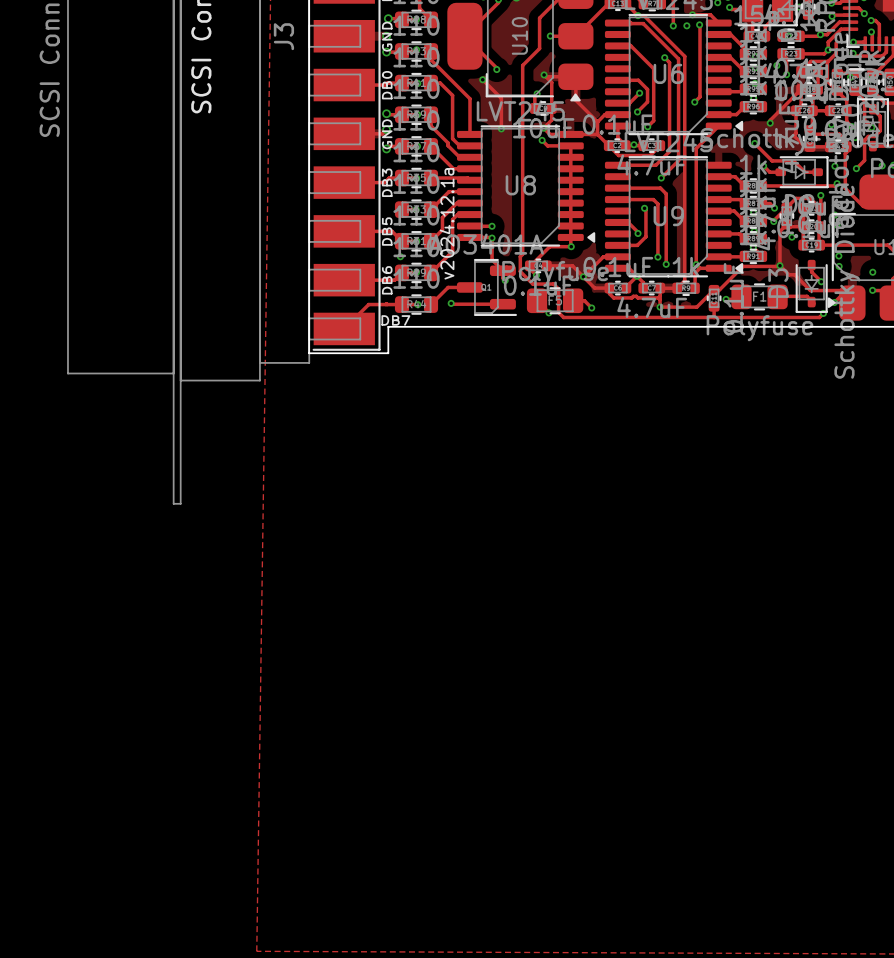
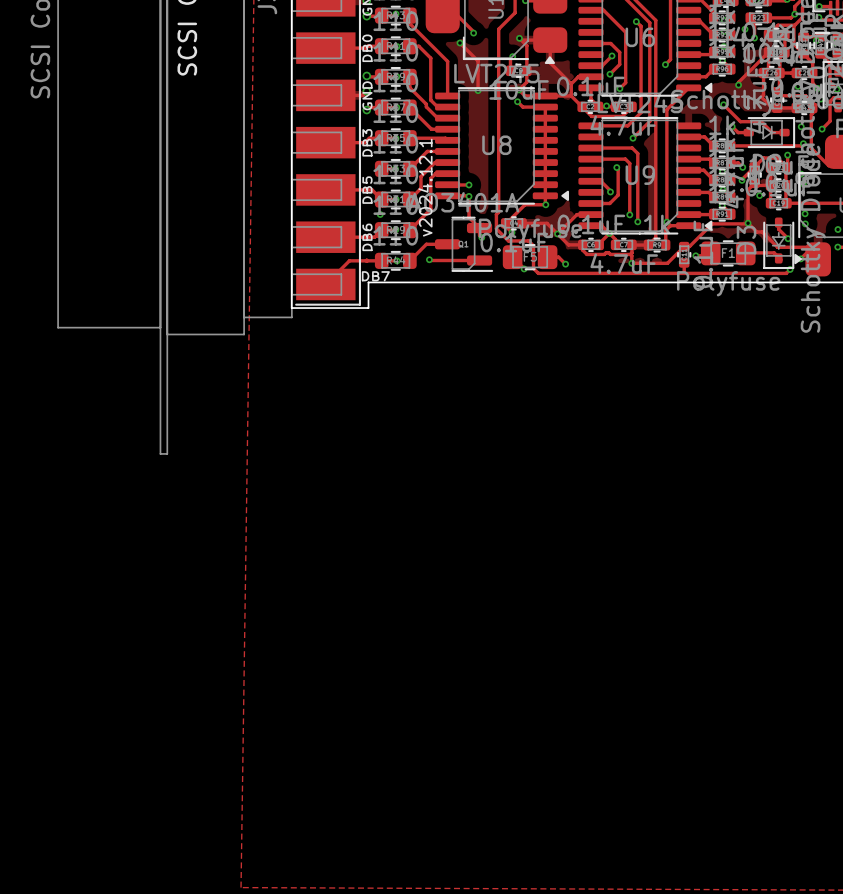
text: v2024.12.1a (447, 223) -> v2024.12.1 (425, 187)

